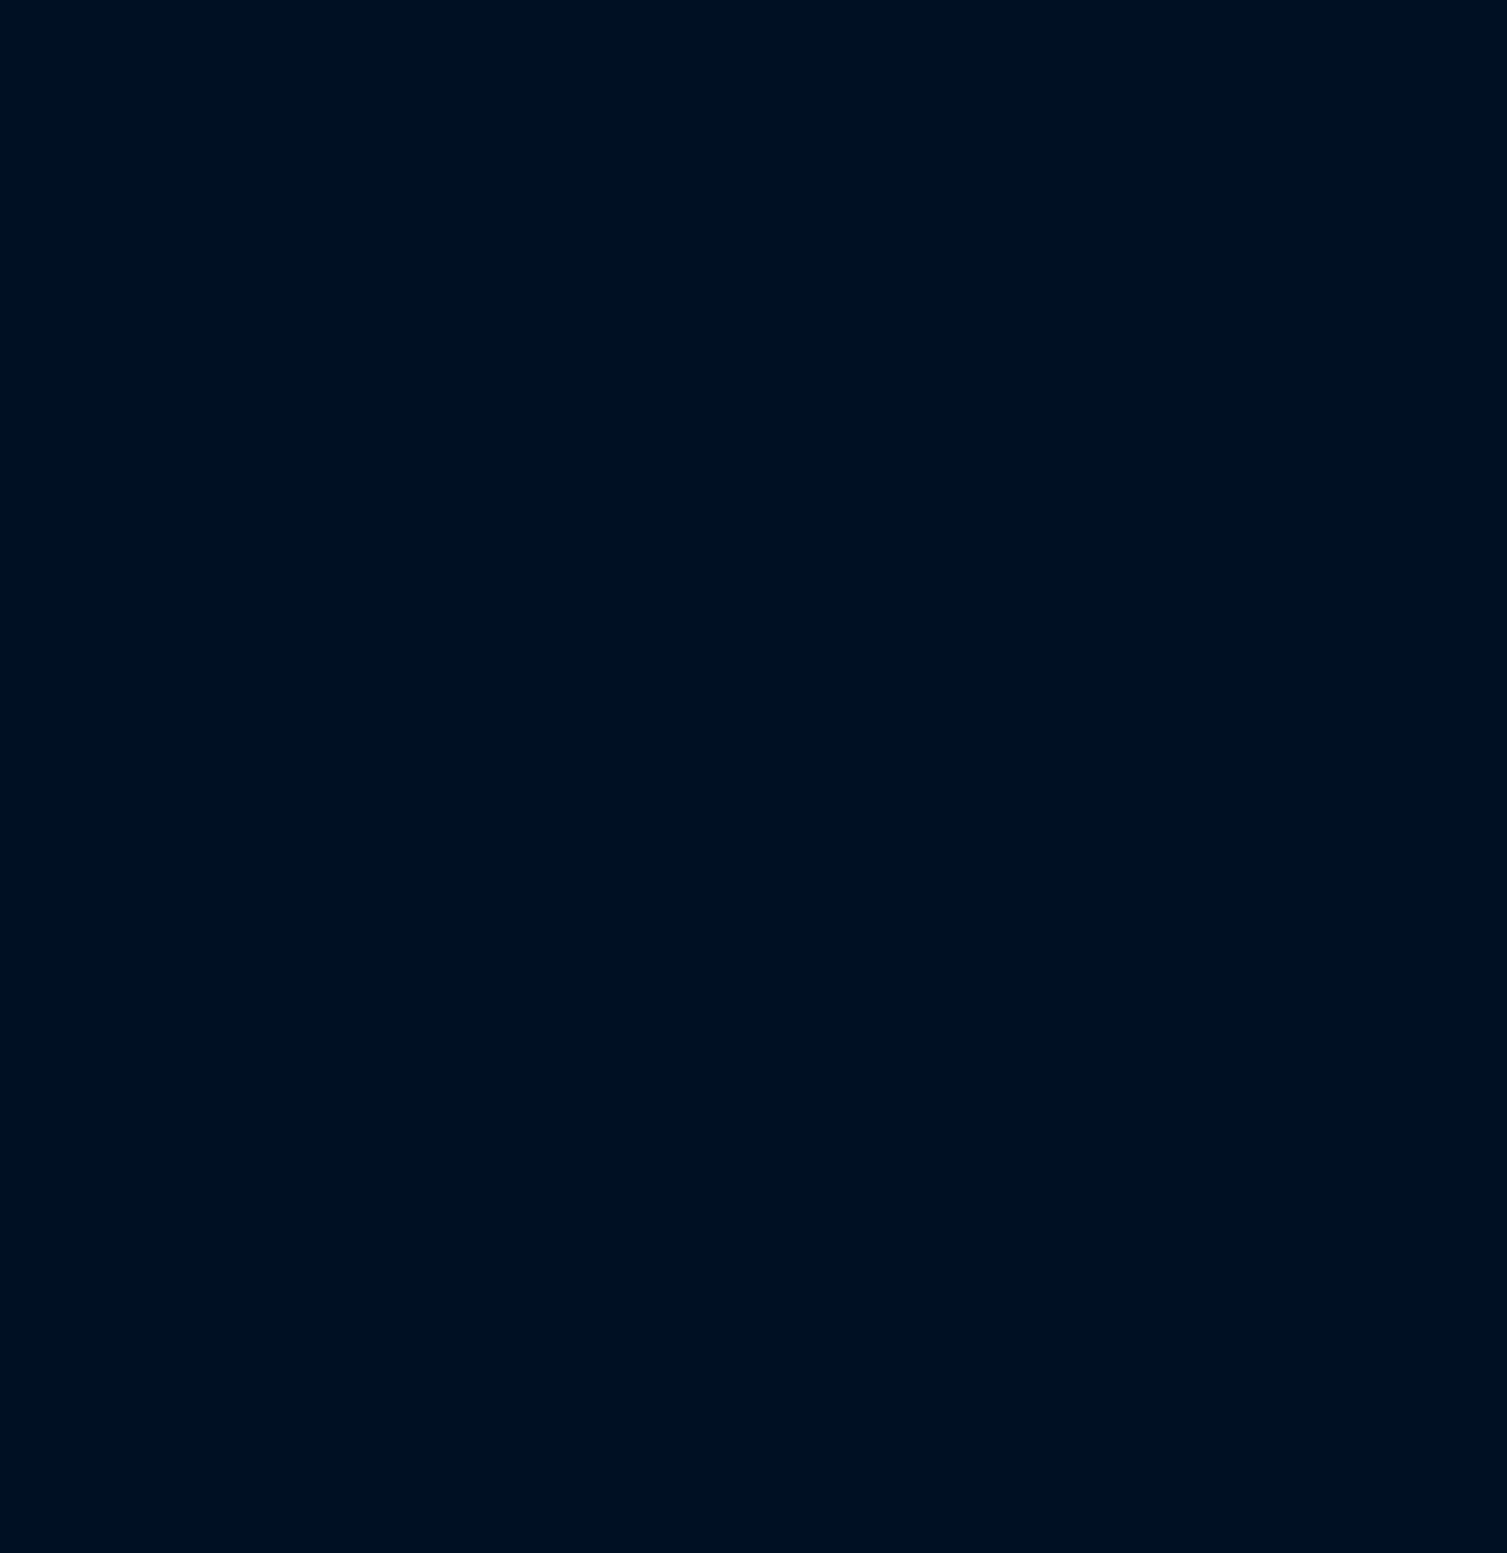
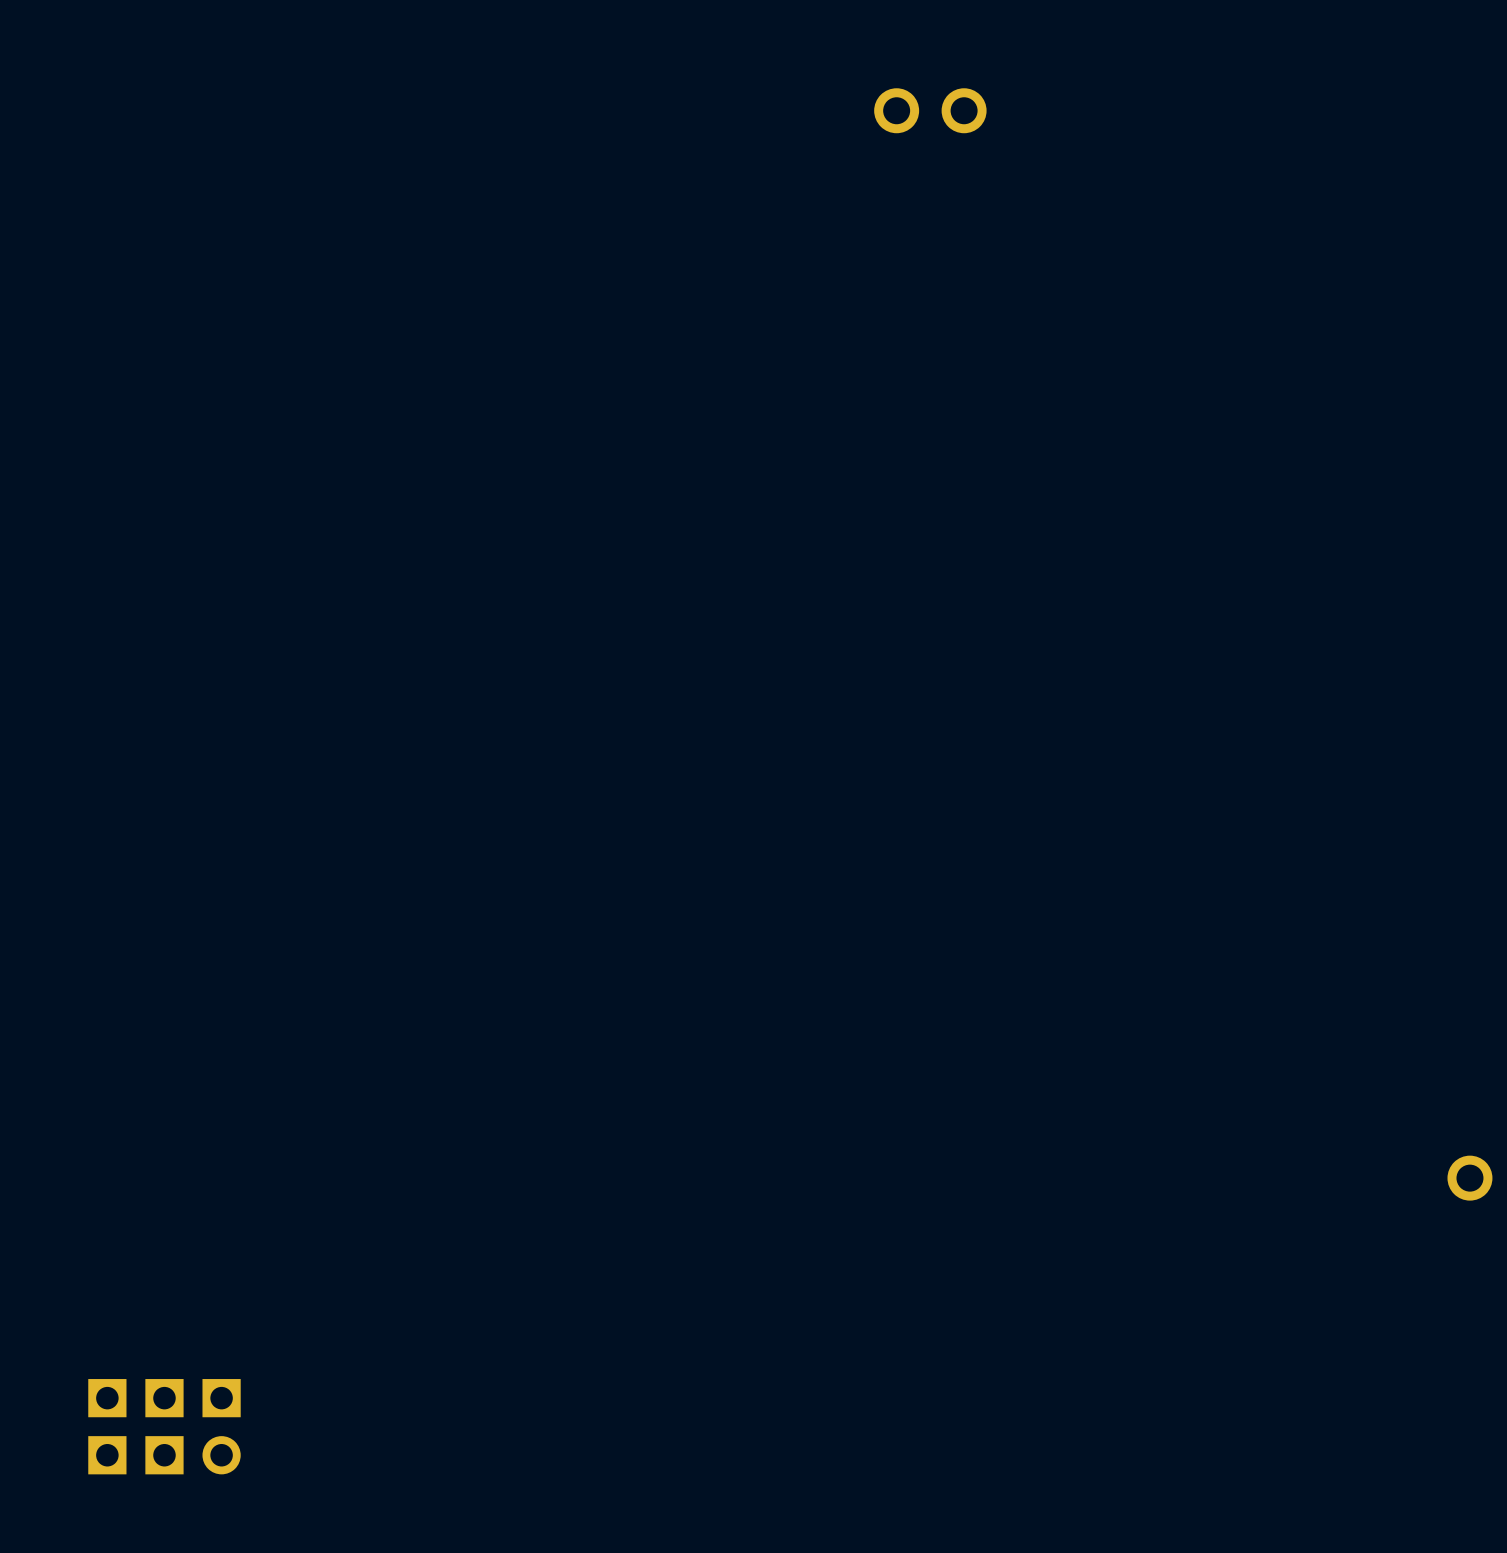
part: none -> (896, 110)
part: none -> (964, 110)
part: none -> (1469, 1178)
part: none -> (164, 1426)

